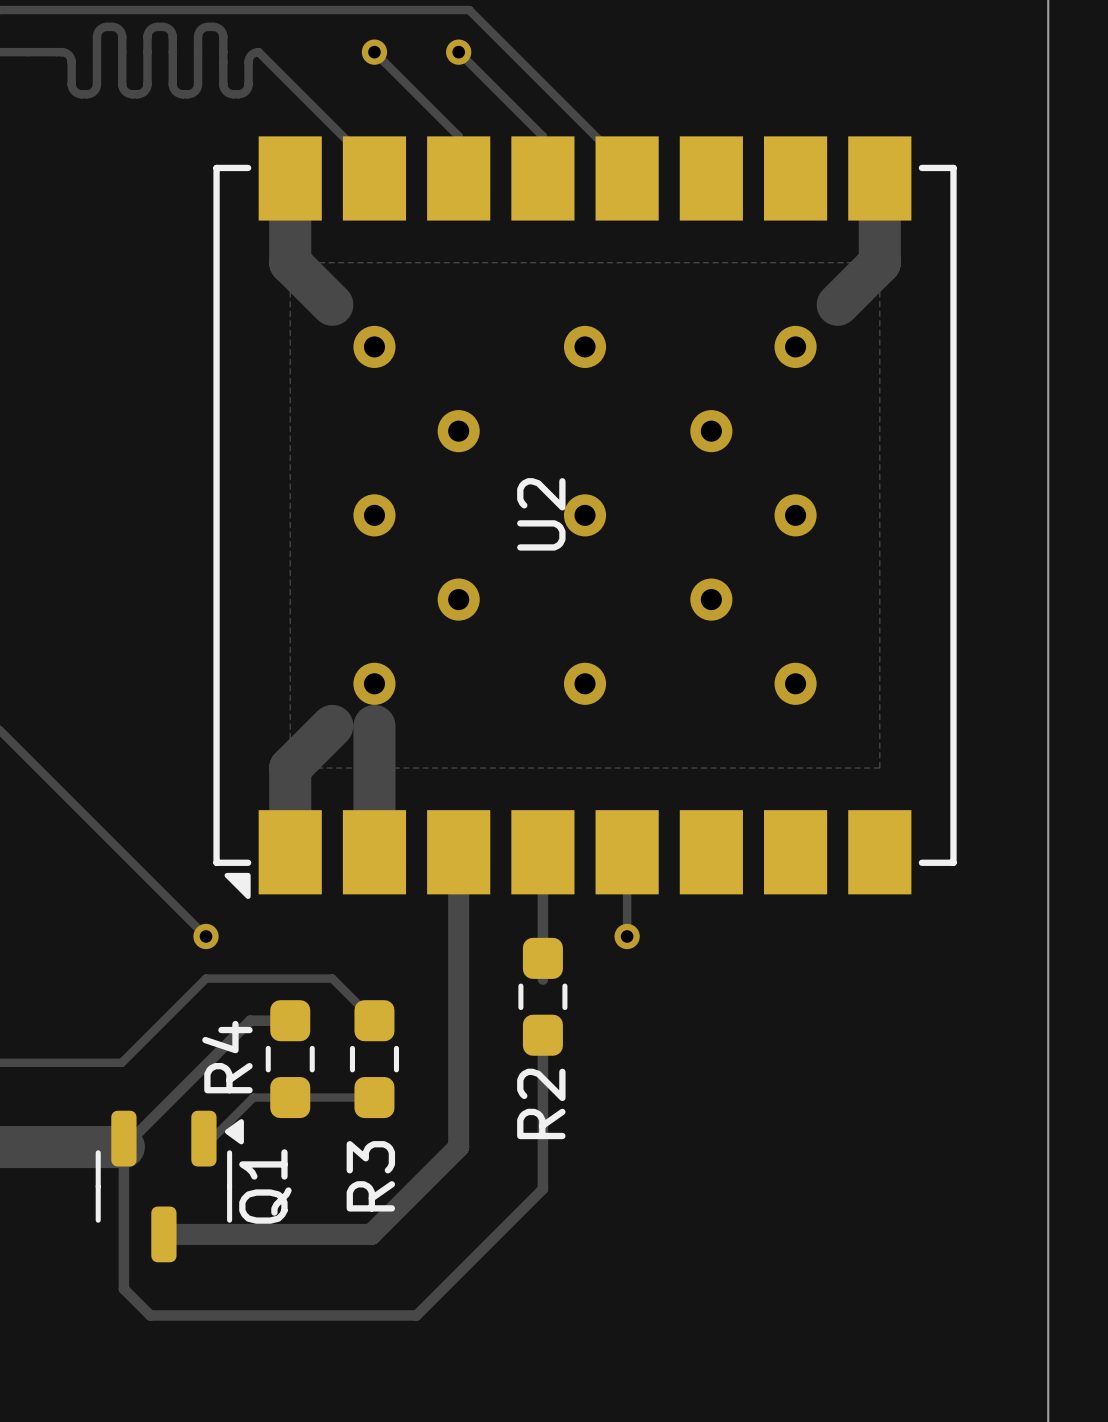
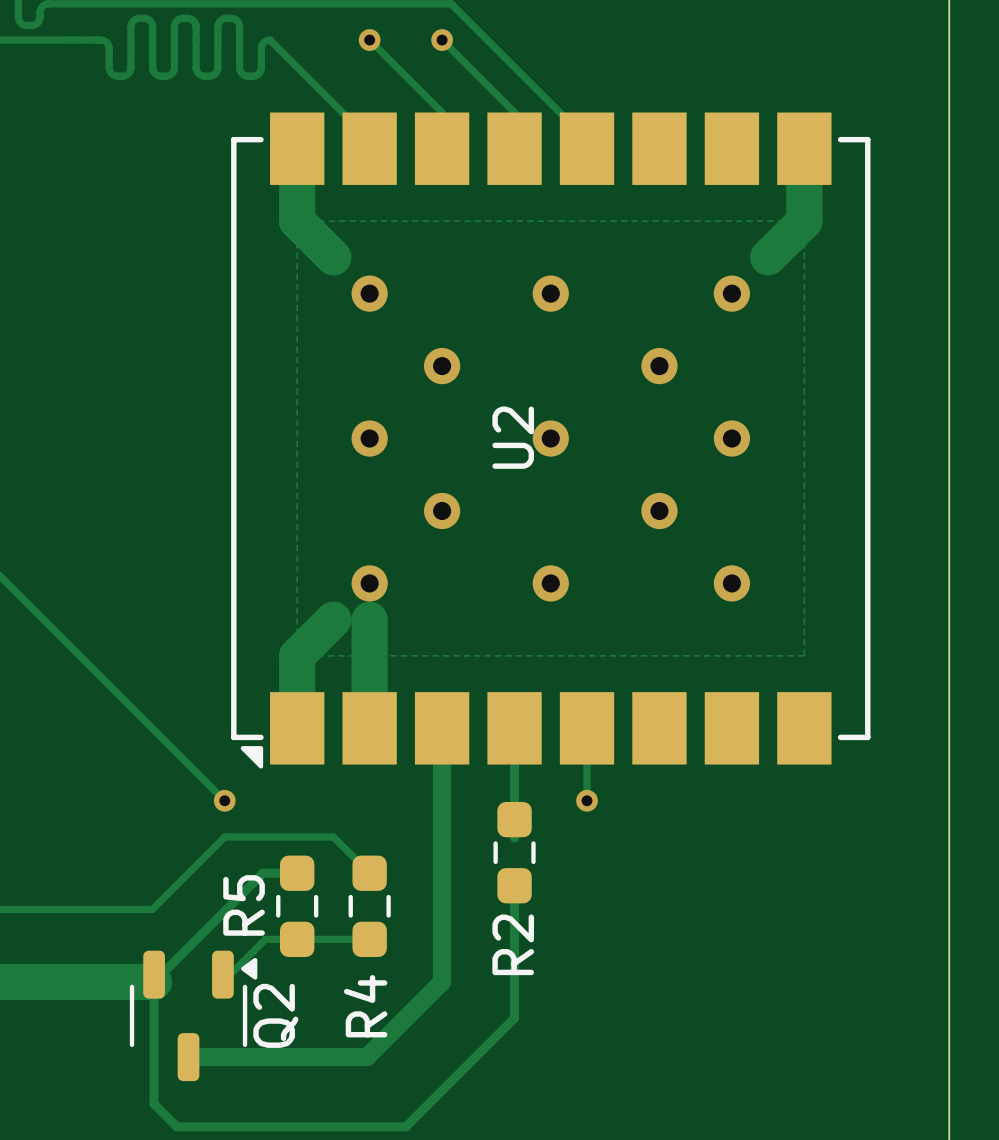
R4 name: R4 (227, 1057) -> R5 (244, 905)
R3 name: R3 (370, 1176) -> R4 (365, 1006)
Q1 name: Q1 (265, 1186) -> Q2 (275, 1015)

